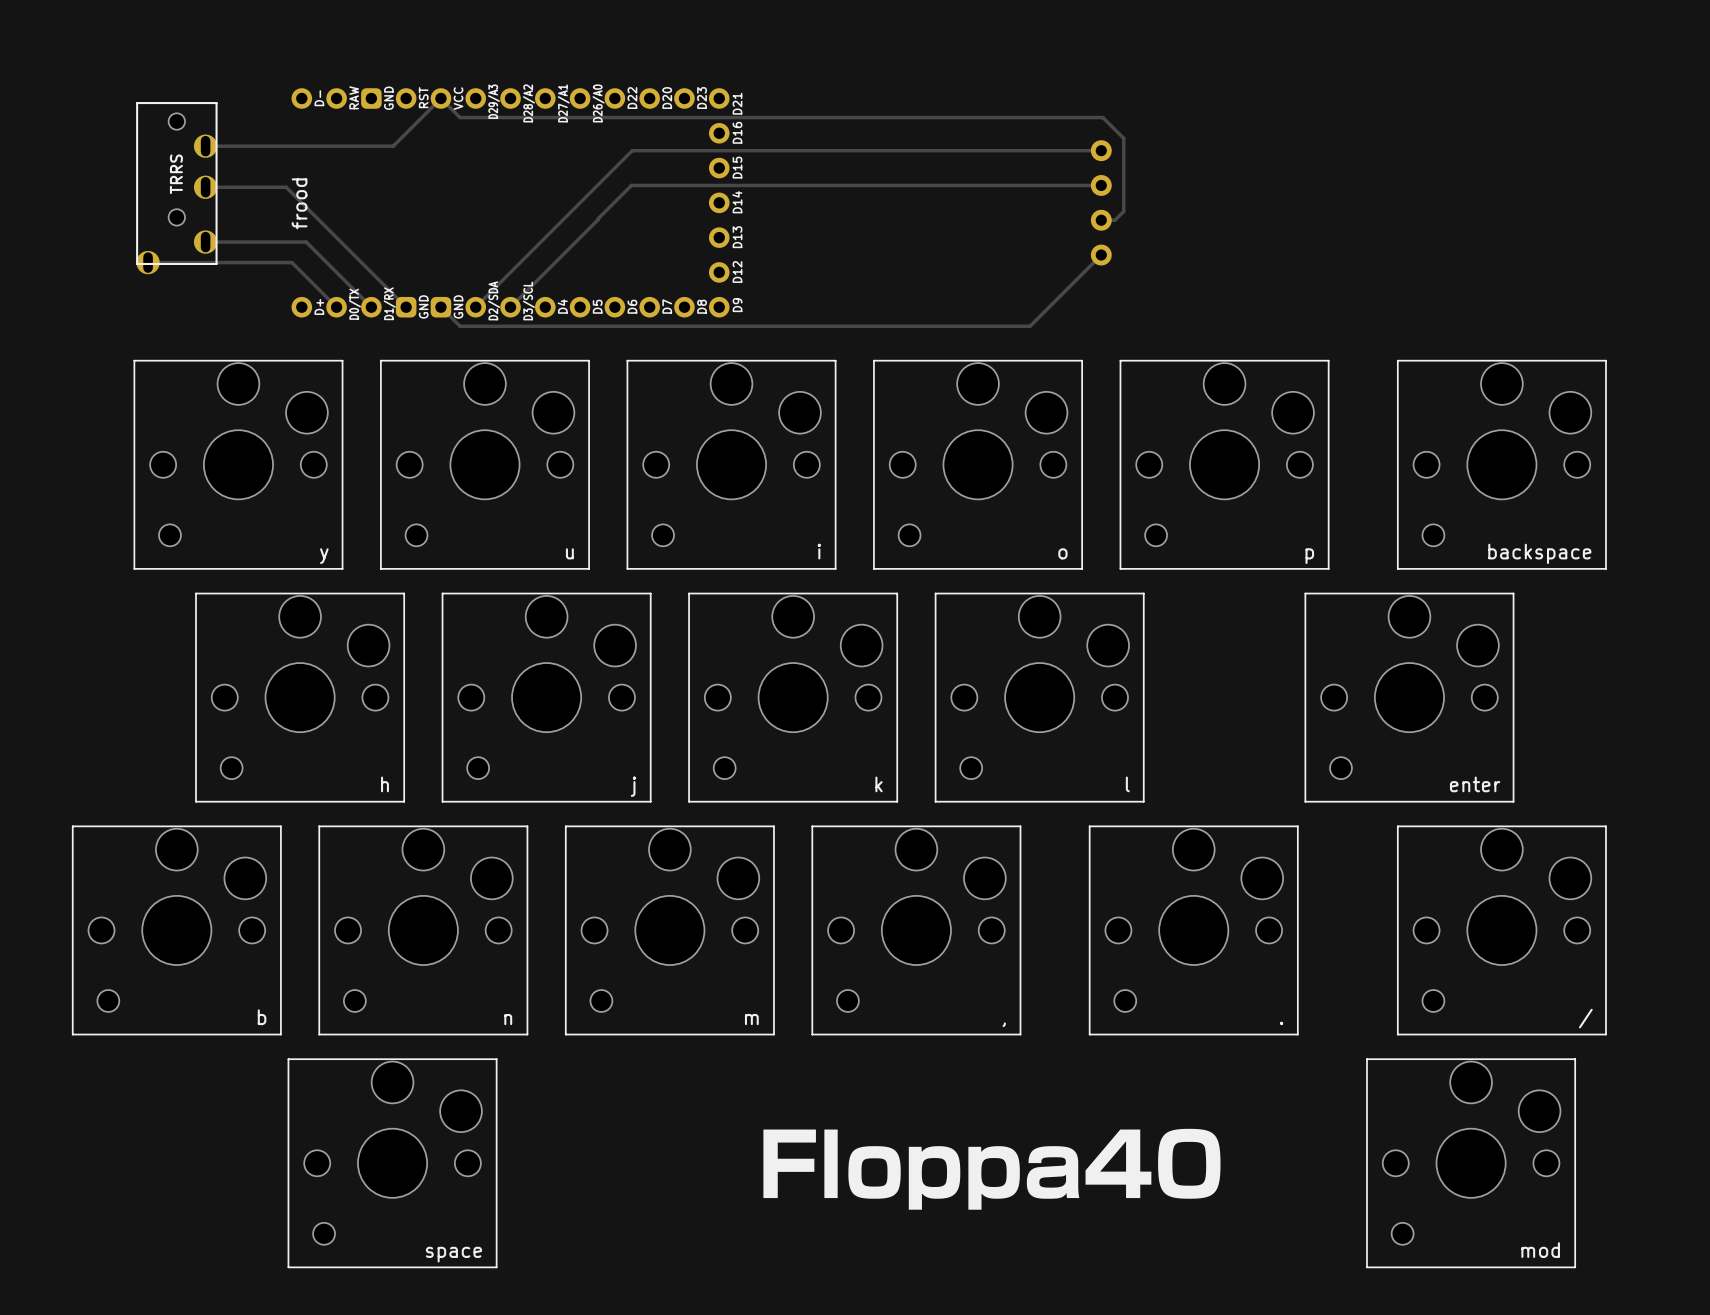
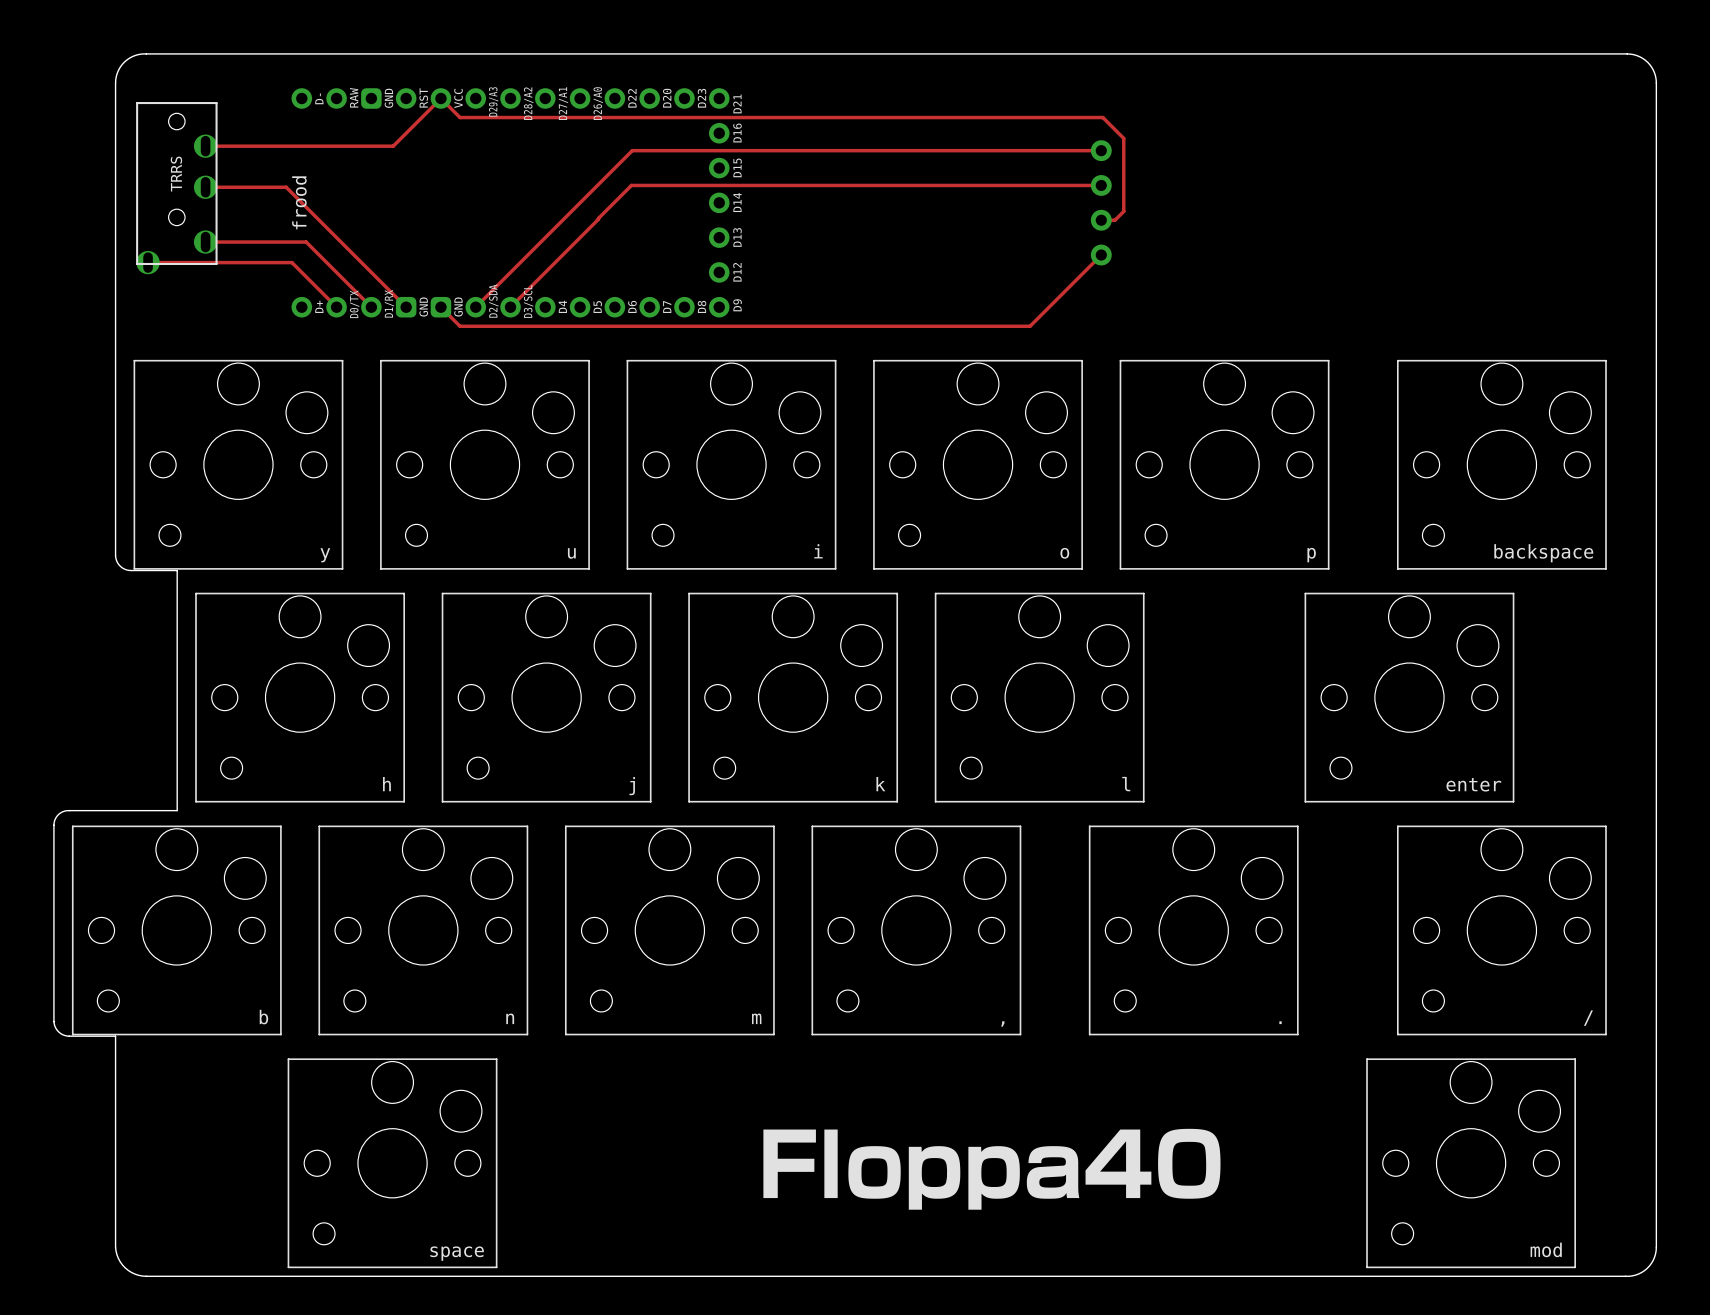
board edge: none -> (146, 53) (1627, 53) (1636, 55) (1645, 60) (1653, 70) (1656, 83) (1656, 1247) (1654, 1257) (1649, 1265) (1638, 1273) (1628, 1276) (146, 1276) (128, 1270) (120, 1261) (115, 1247) (115, 1036) (65, 1035) (57, 1030) (54, 1023) (53, 825) (57, 815) (65, 810) (177, 810) (177, 570) (127, 570) (119, 564) (115, 555) (115, 79) (120, 67) (127, 59) (136, 55) (146, 53)

